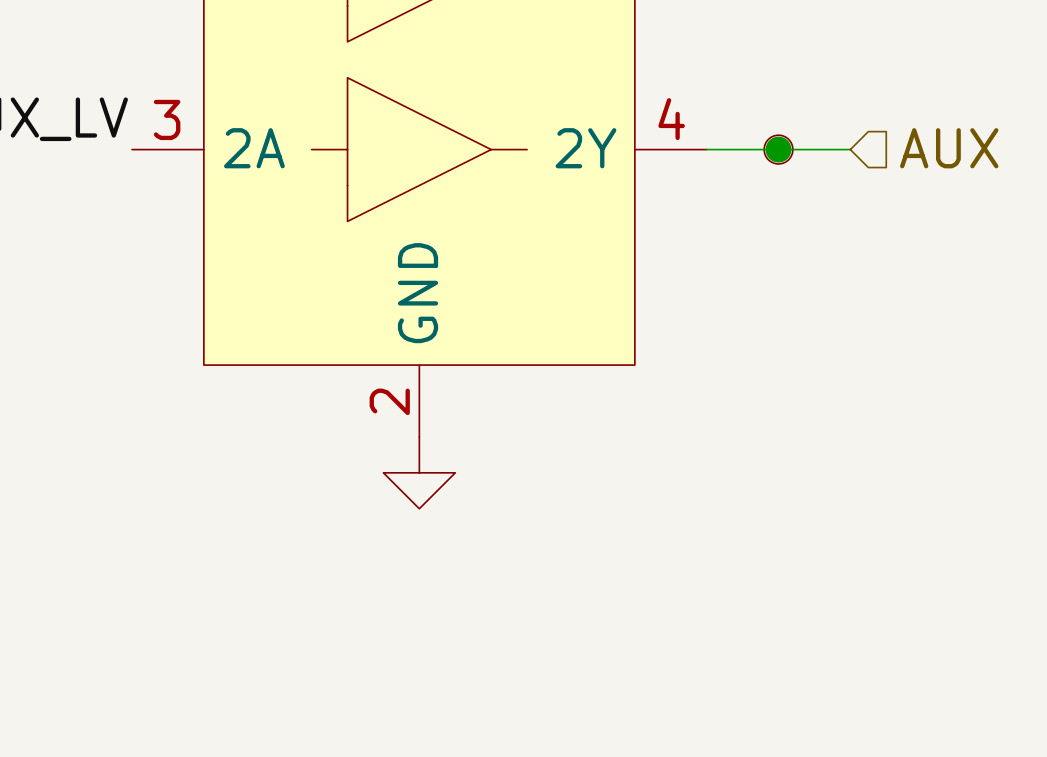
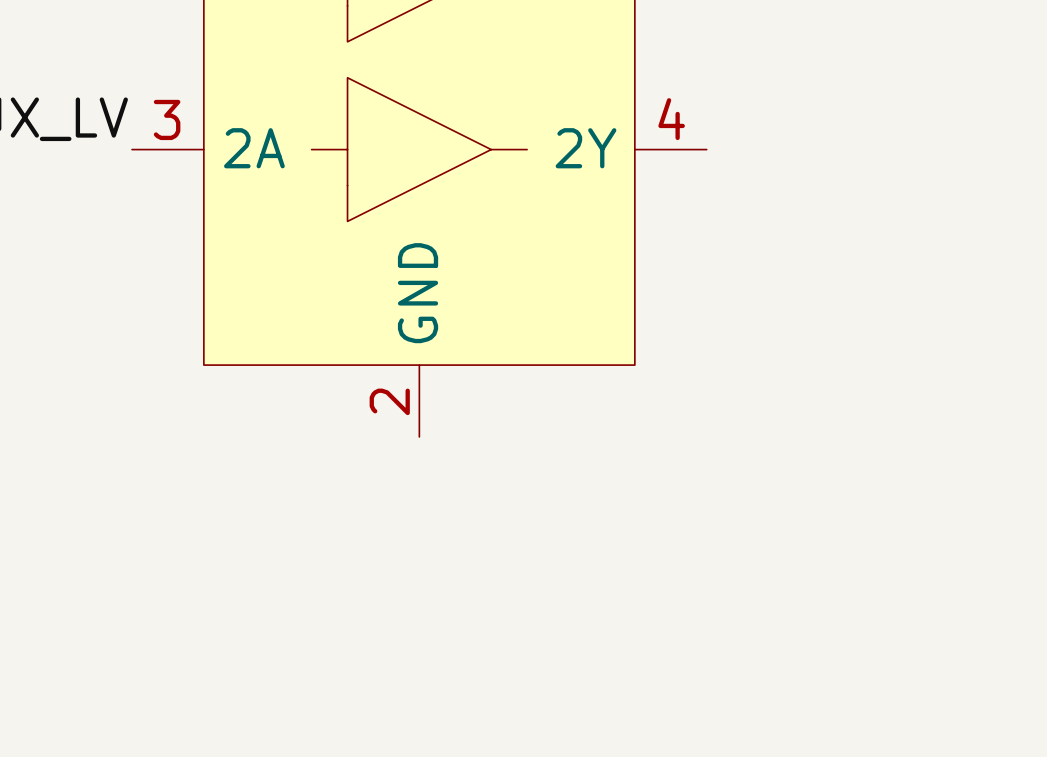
hierarchical label: AUX (949, 148) -> none
wire: (706, 149) (850, 149) -> none
junction: (778, 149) -> none
part: (778, 149) -> none
power symbol: (419, 472) -> none

